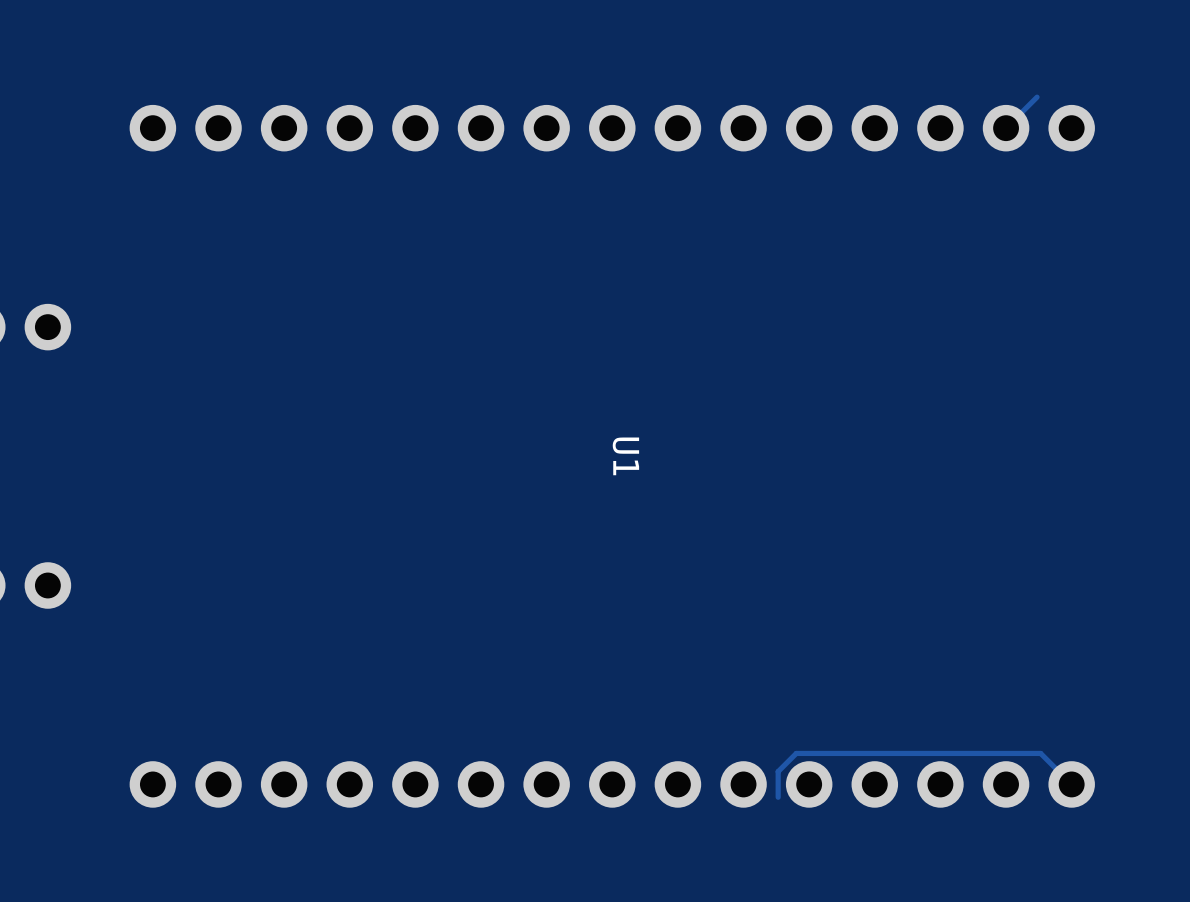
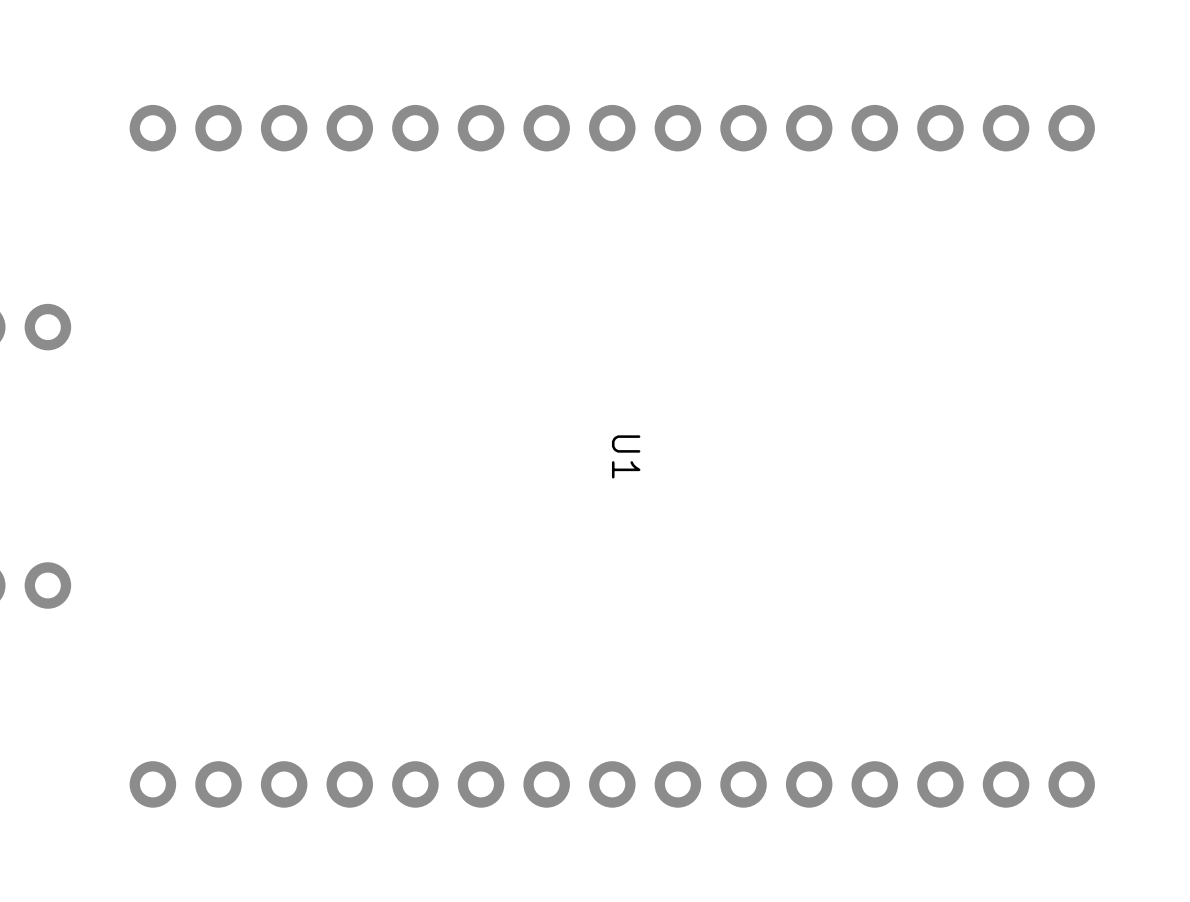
track: (1037, 97) (1006, 128) -> none
track: (1071, 784) (1040, 753) (796, 753) (778, 771) (778, 797) -> none

